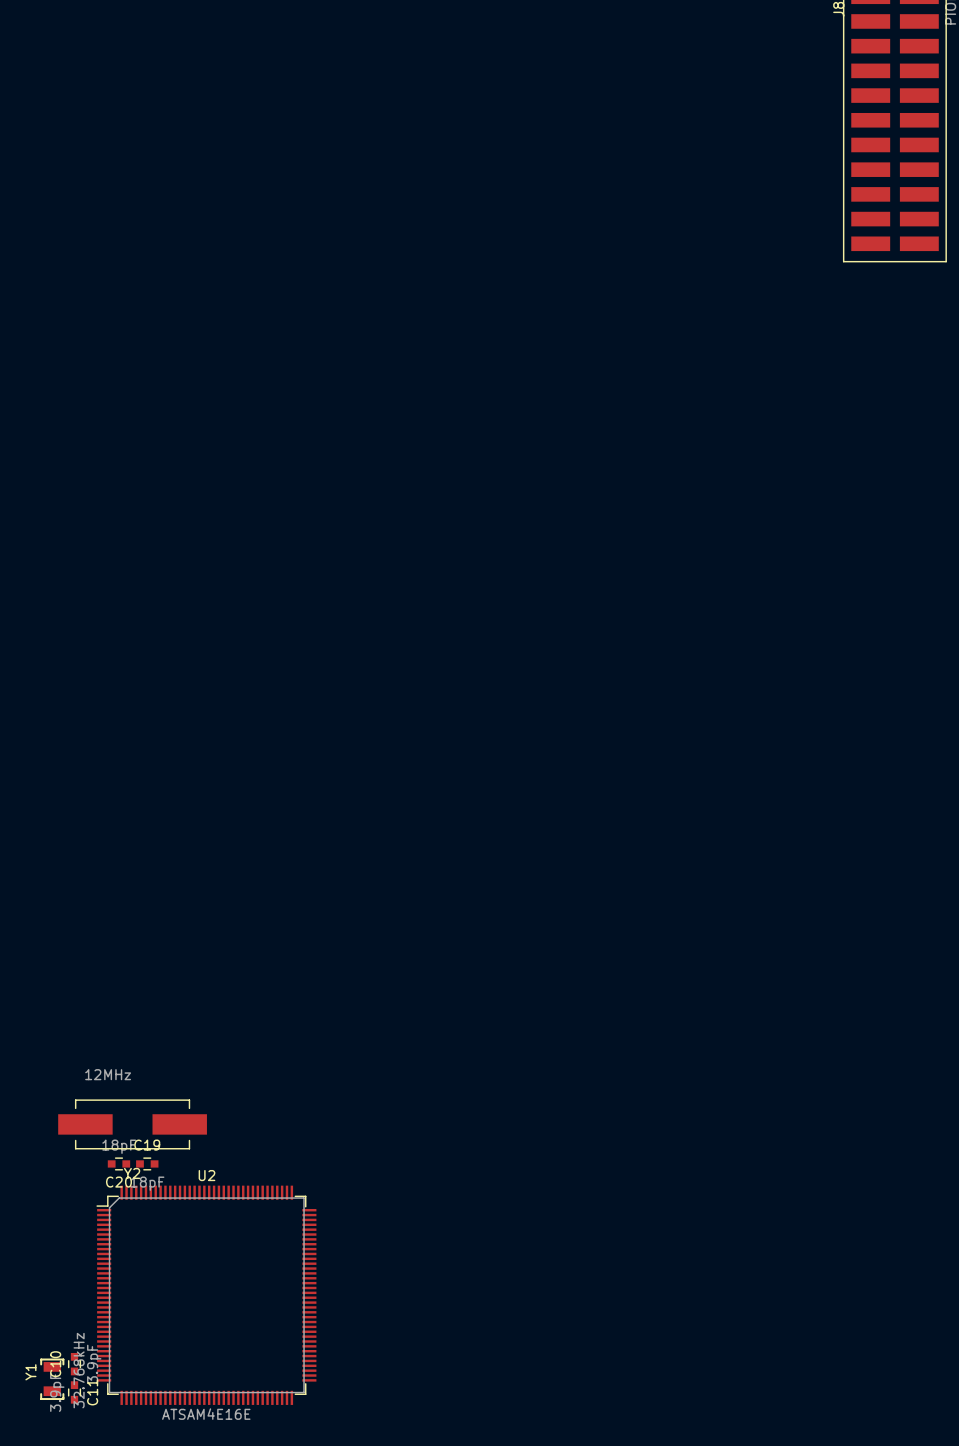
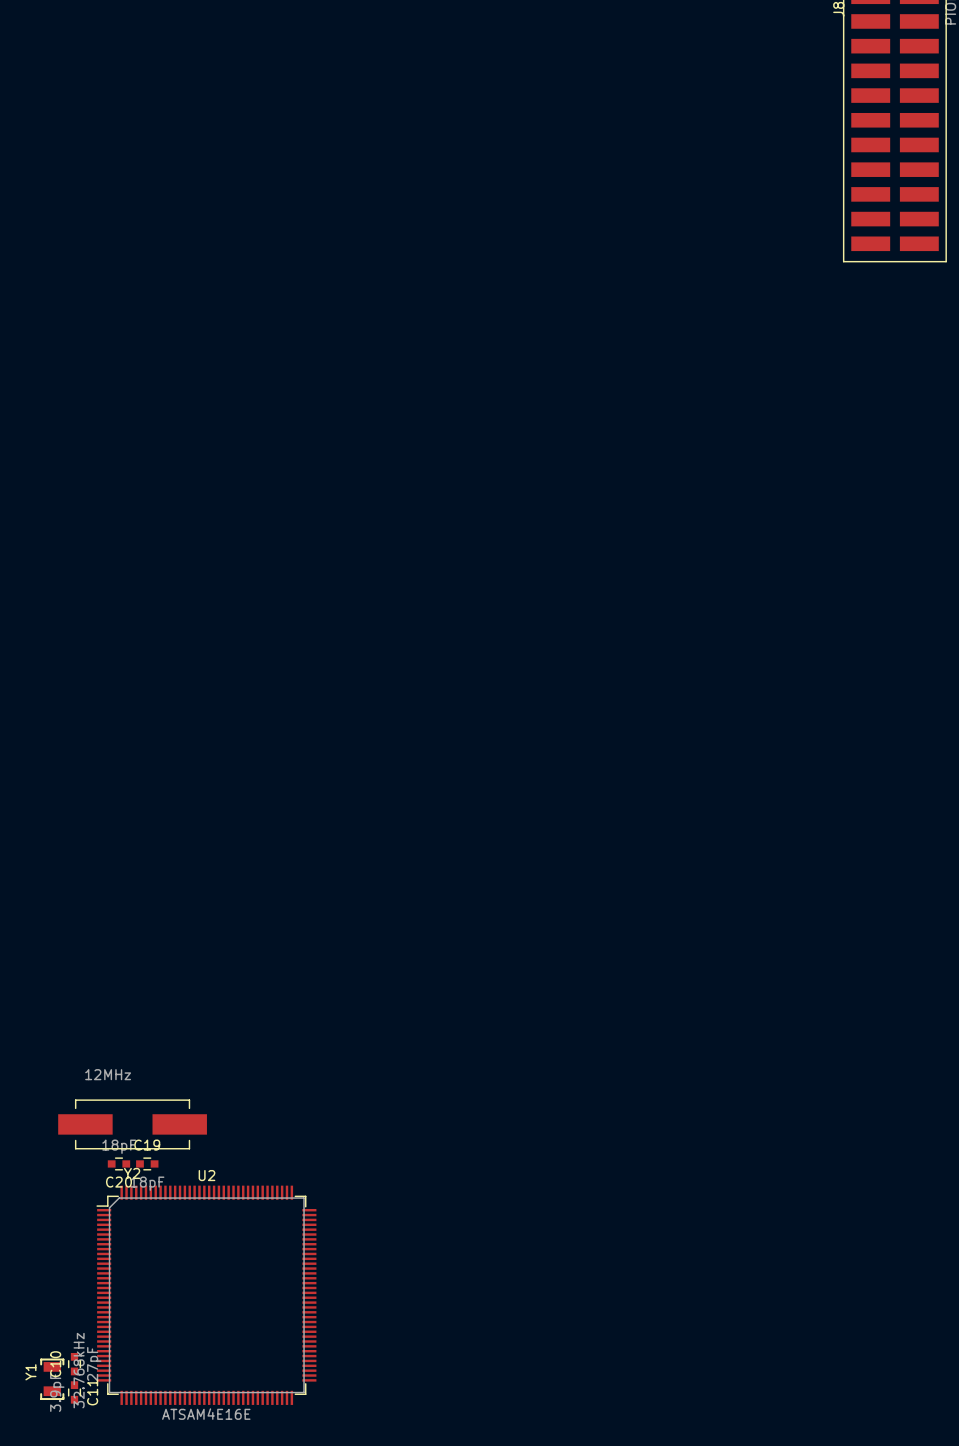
C10 value: 3.9pF (94, 1364) -> 27pF (94, 1364)

